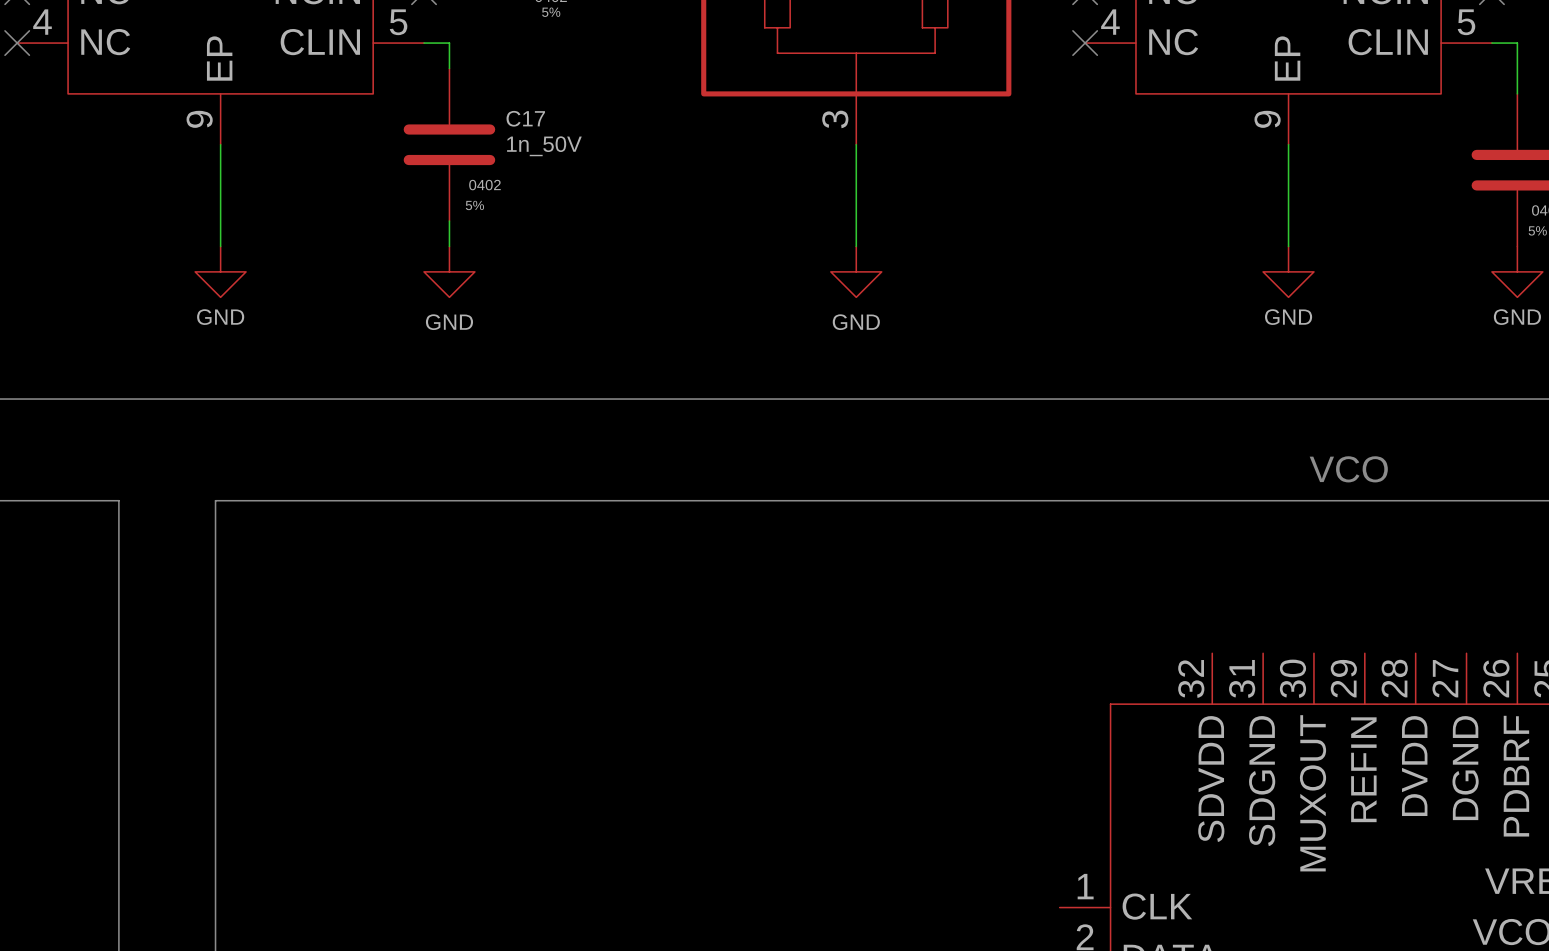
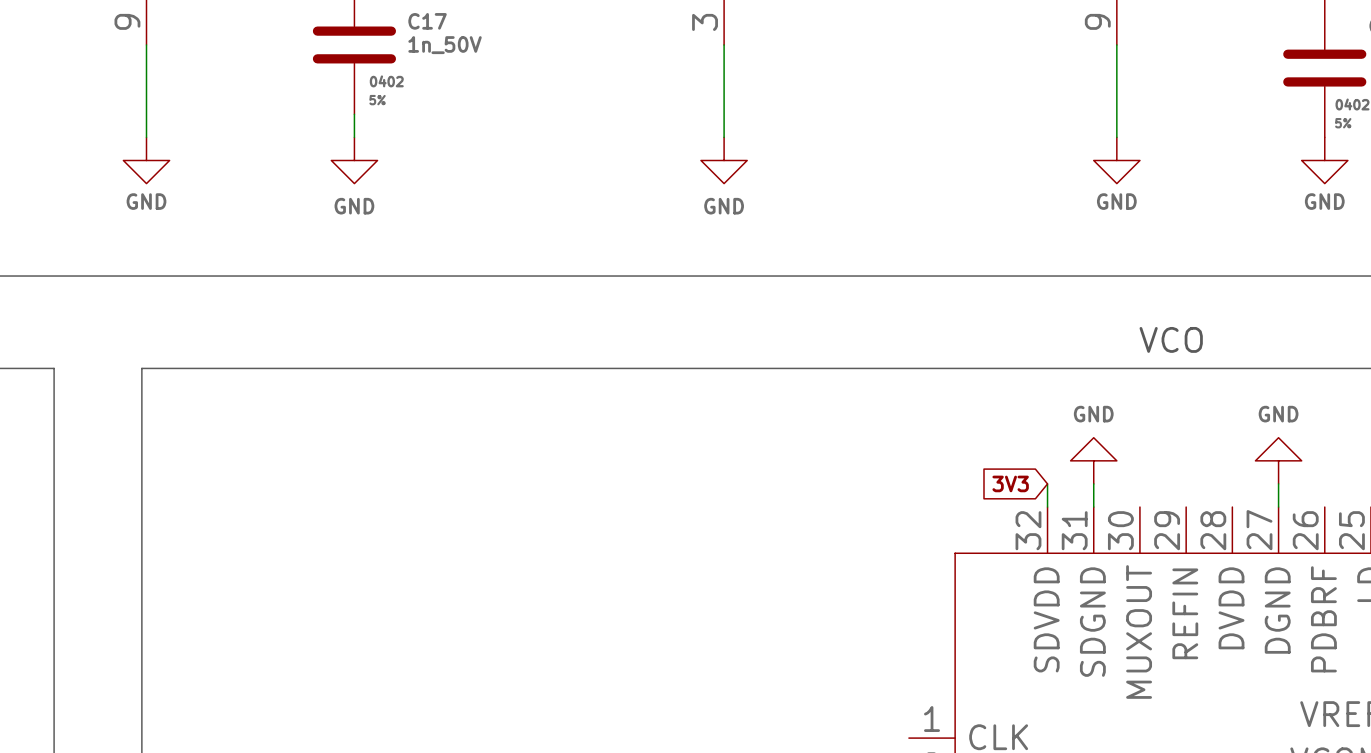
power symbol: none -> GND (1093, 460)
power symbol: none -> GND (1278, 460)
global label: none -> 3V3 (1010, 483)
wire: none -> (1047, 483) (1047, 507)
wire: none -> (1093, 483) (1093, 507)
wire: none -> (1278, 483) (1278, 507)

